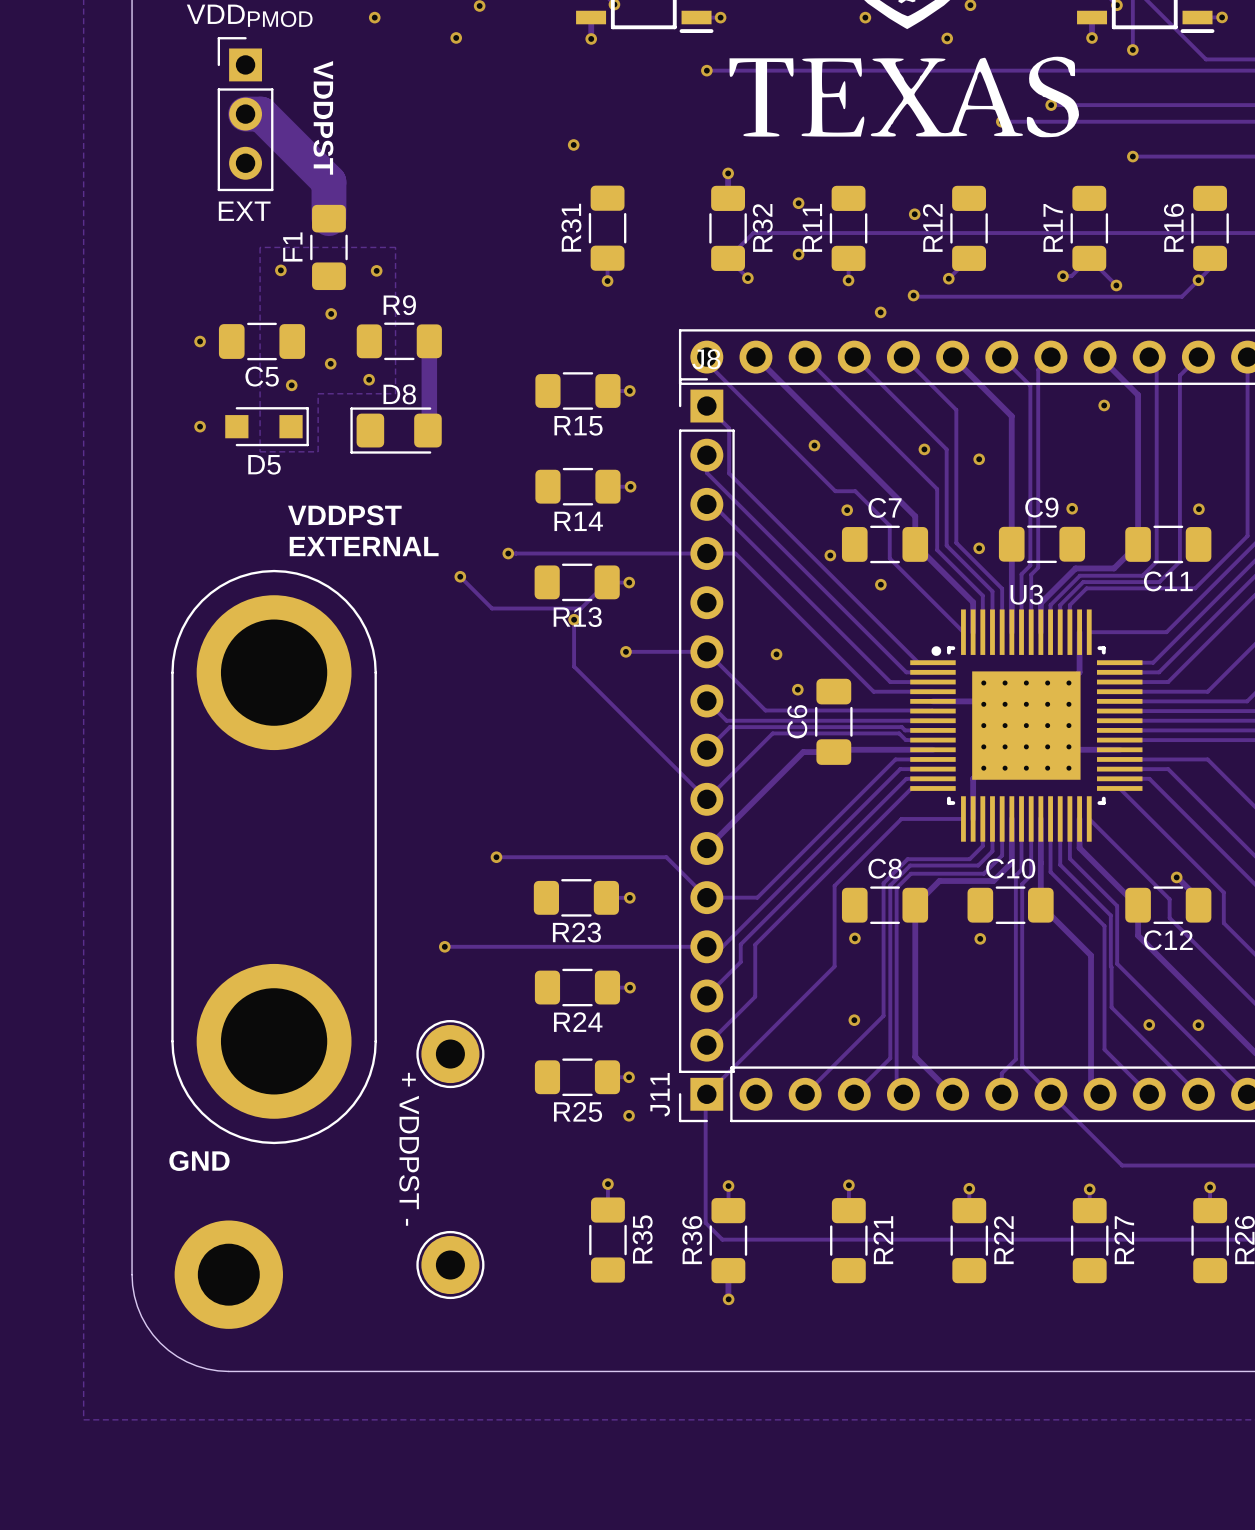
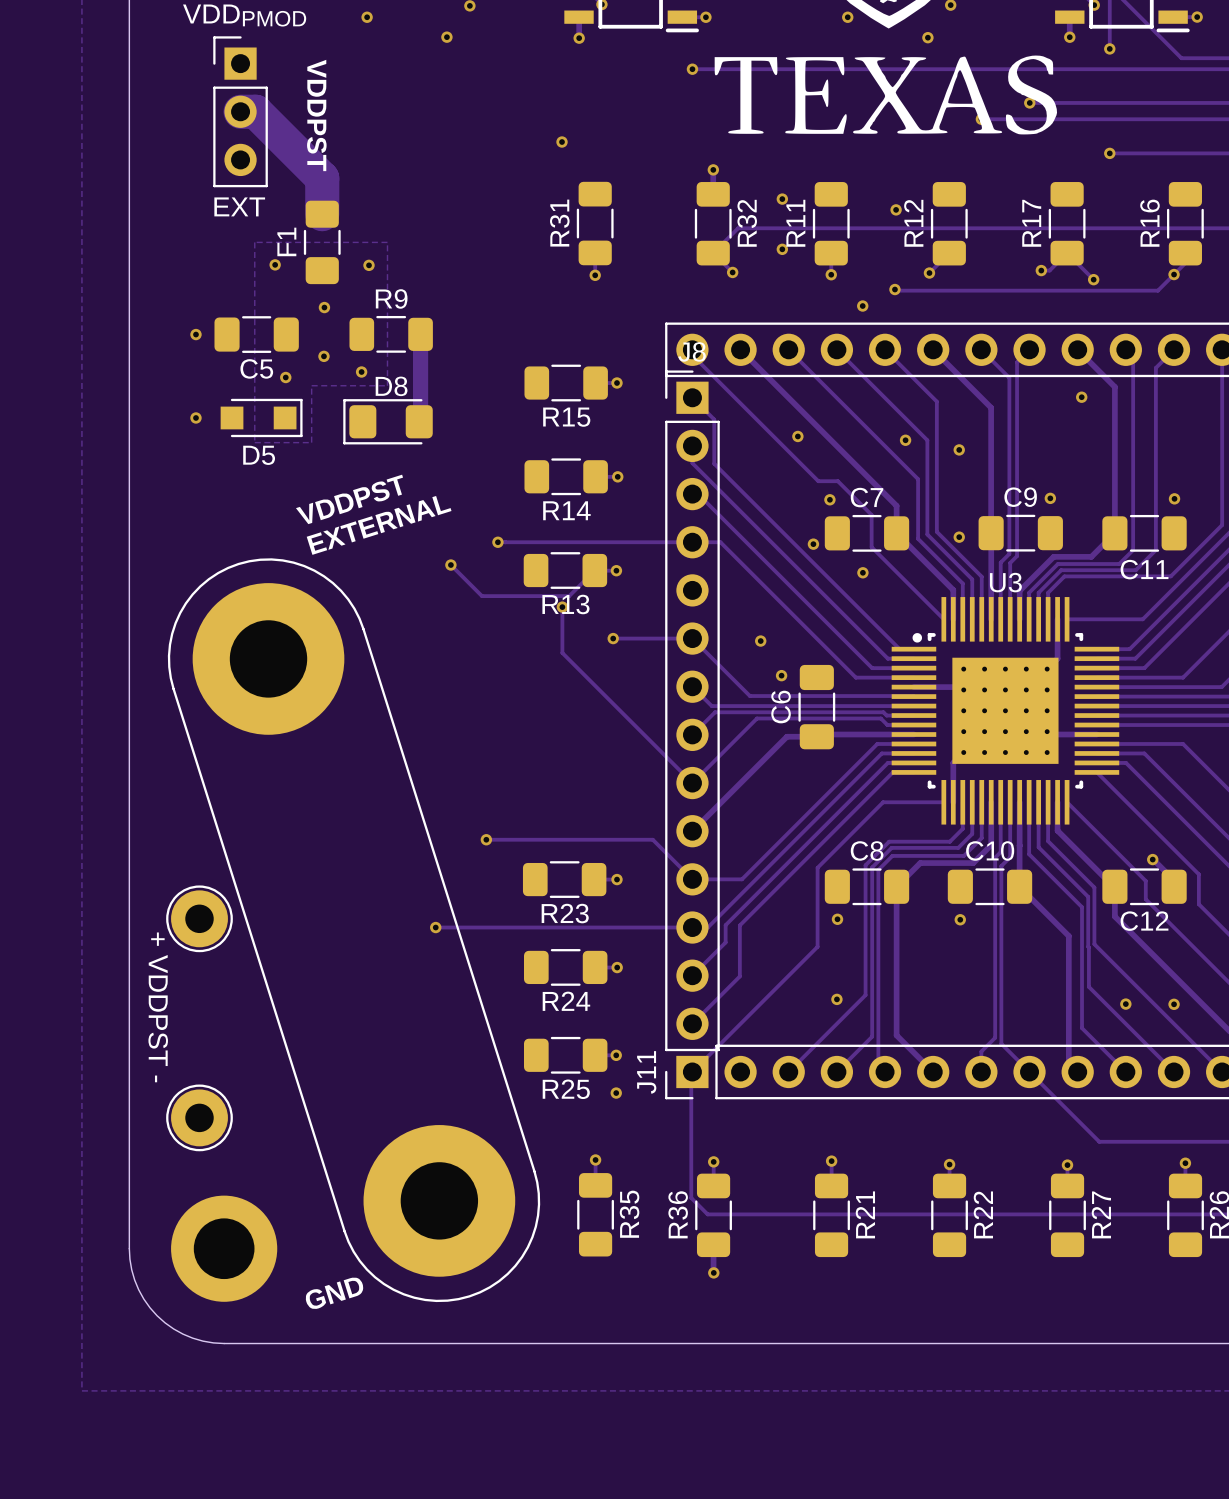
text rotation: 0° (344, 515) -> 17.5° counterclockwise (349, 499)
text rotation: 0° (364, 546) -> 17.5° counterclockwise (379, 525)
part: (274, 857) -> none
part: none -> (199, 918)
part: none -> (354, 930)
part: (450, 1054) -> none
part: none -> (199, 1117)
text position: + VDDPST - (409, 1149) -> + VDDPST - (158, 1007)
text rotation: 0° (199, 1161) -> 17.5° counterclockwise (334, 1293)
text position: GND (199, 1161) -> GND (334, 1293)
part: (450, 1265) -> none

